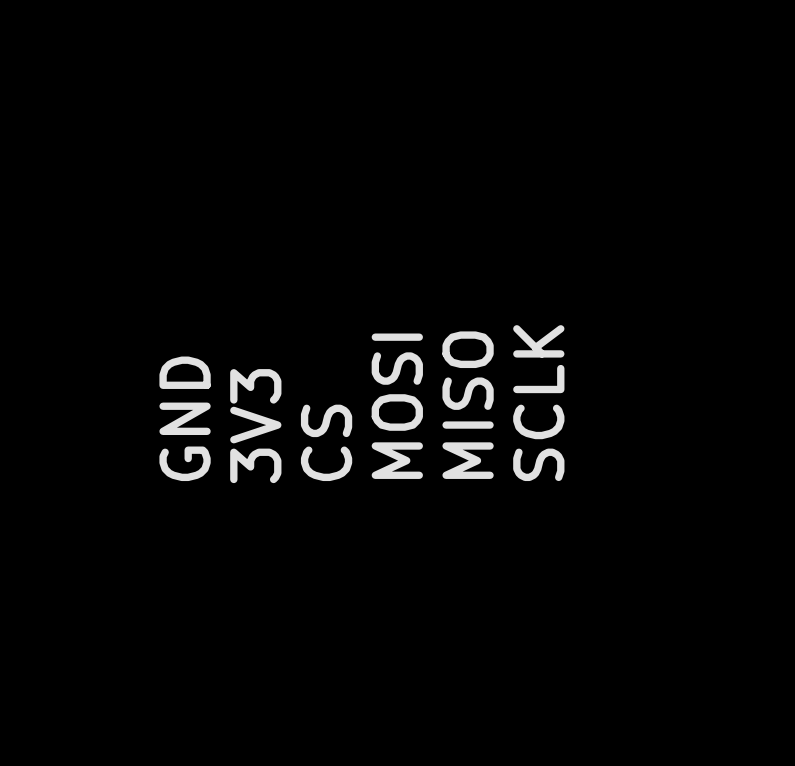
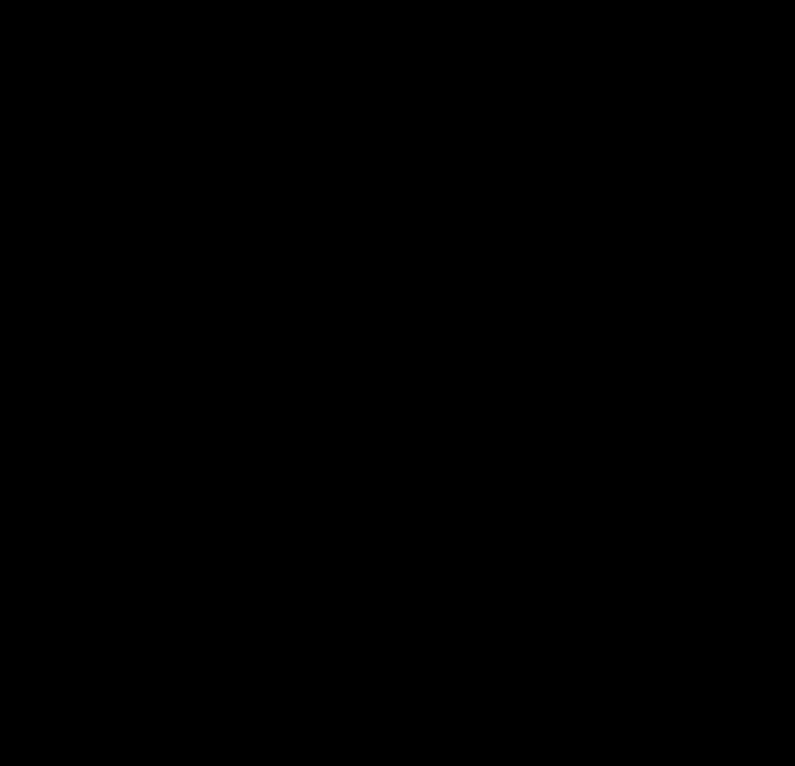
text: SCLK (538, 403) -> none
text: MISO (468, 405) -> none
text: MOSI (397, 406) -> none
text: GND (185, 418) -> none
text: 3V3 (255, 426) -> none
text: CS (326, 442) -> none

